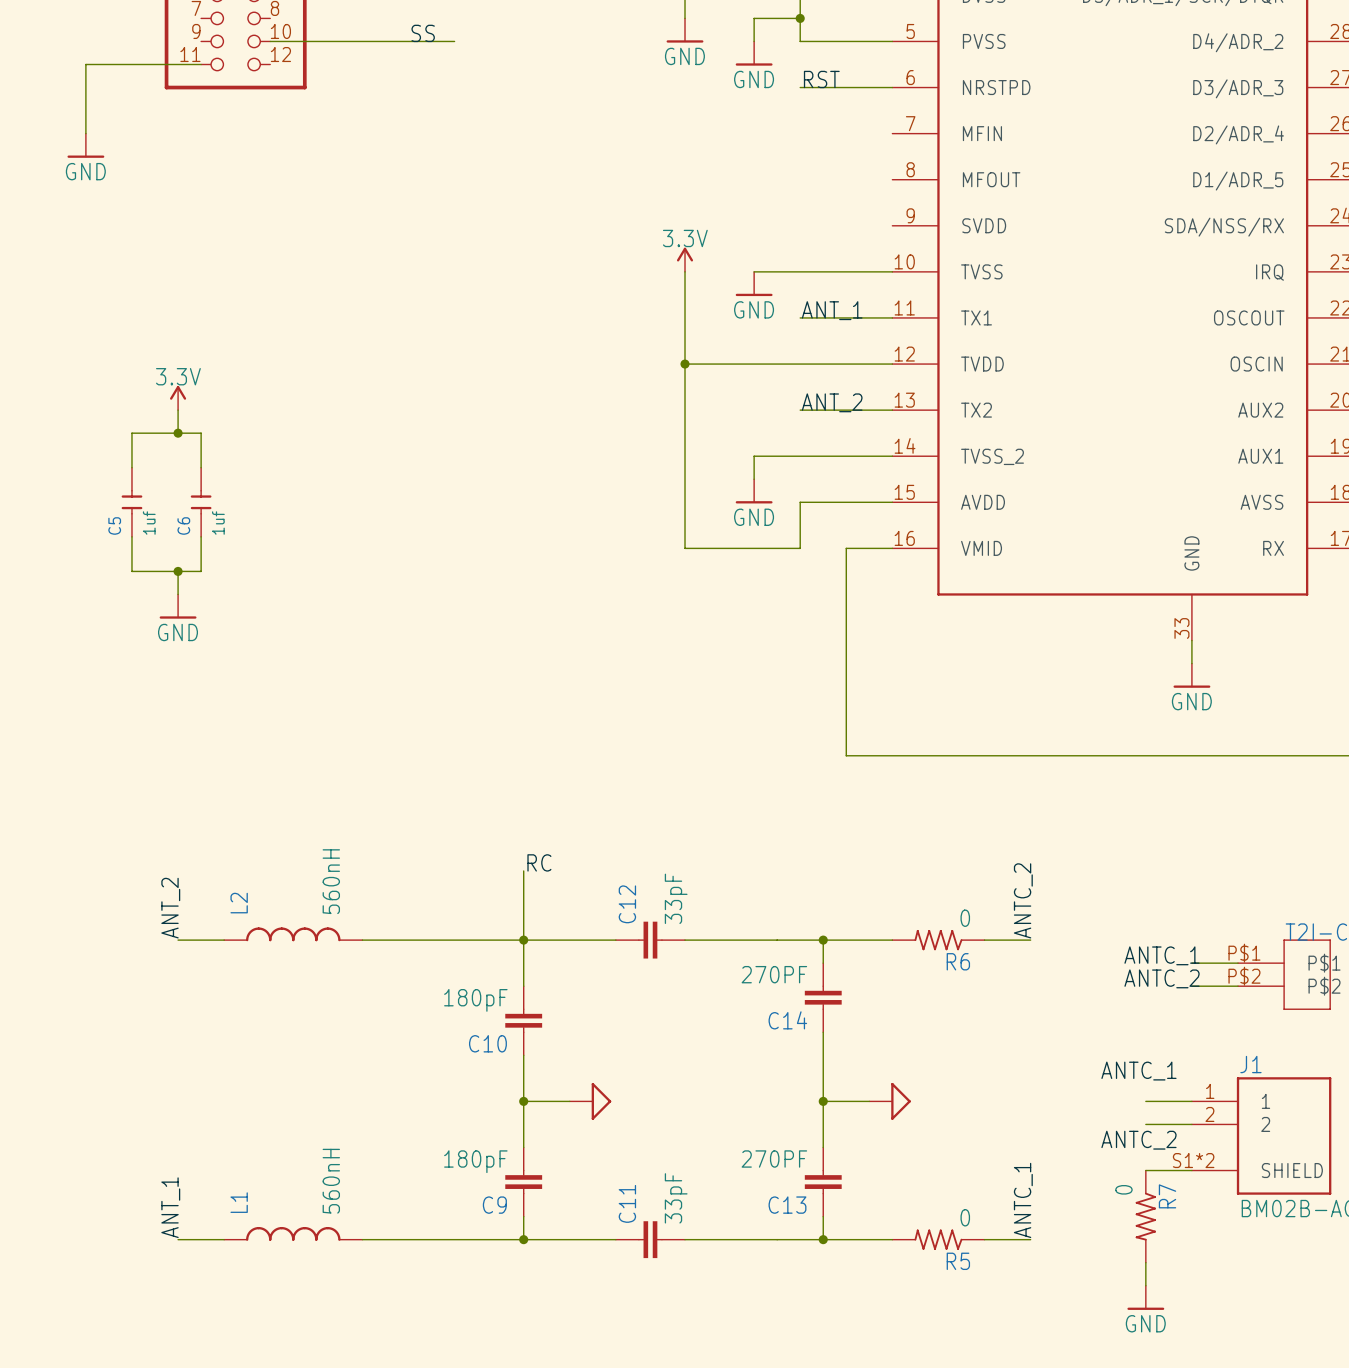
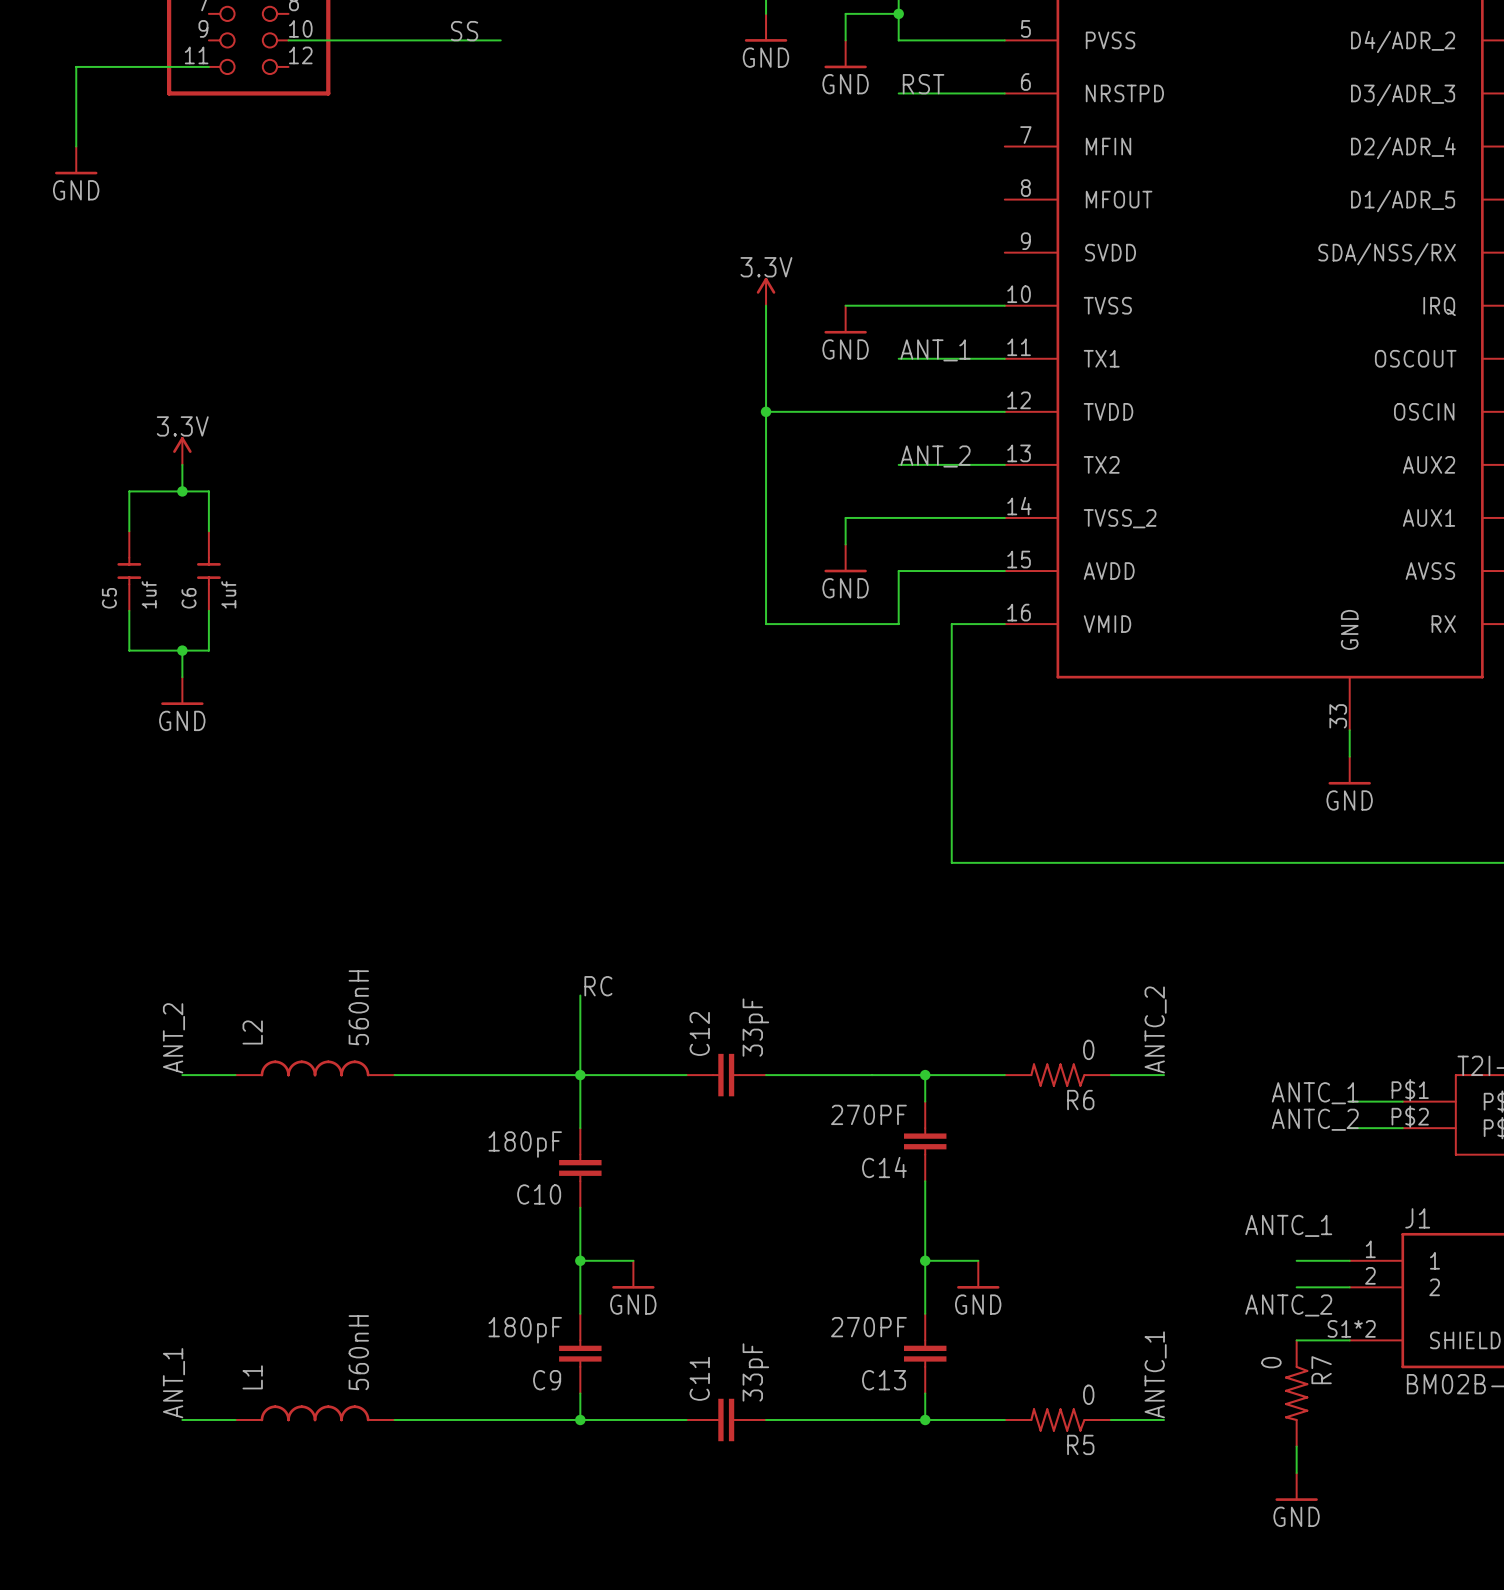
power symbol: (590, 1101) -> none
power symbol: (890, 1101) -> none
power symbol: none -> GND (633, 1274)
power symbol: none -> GND (978, 1274)

